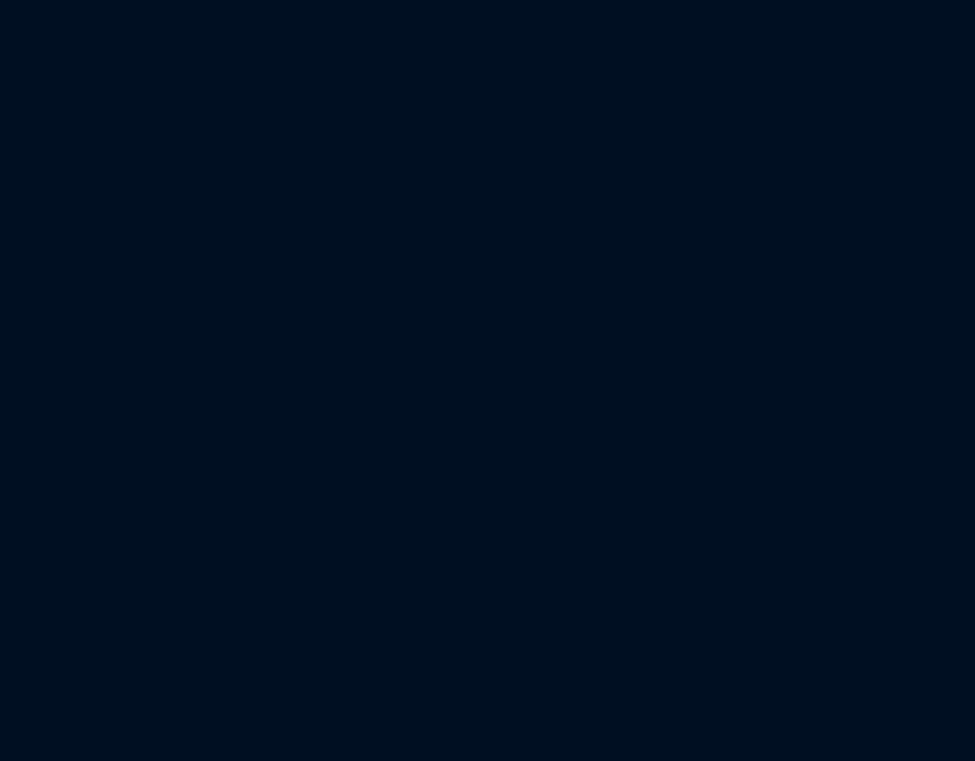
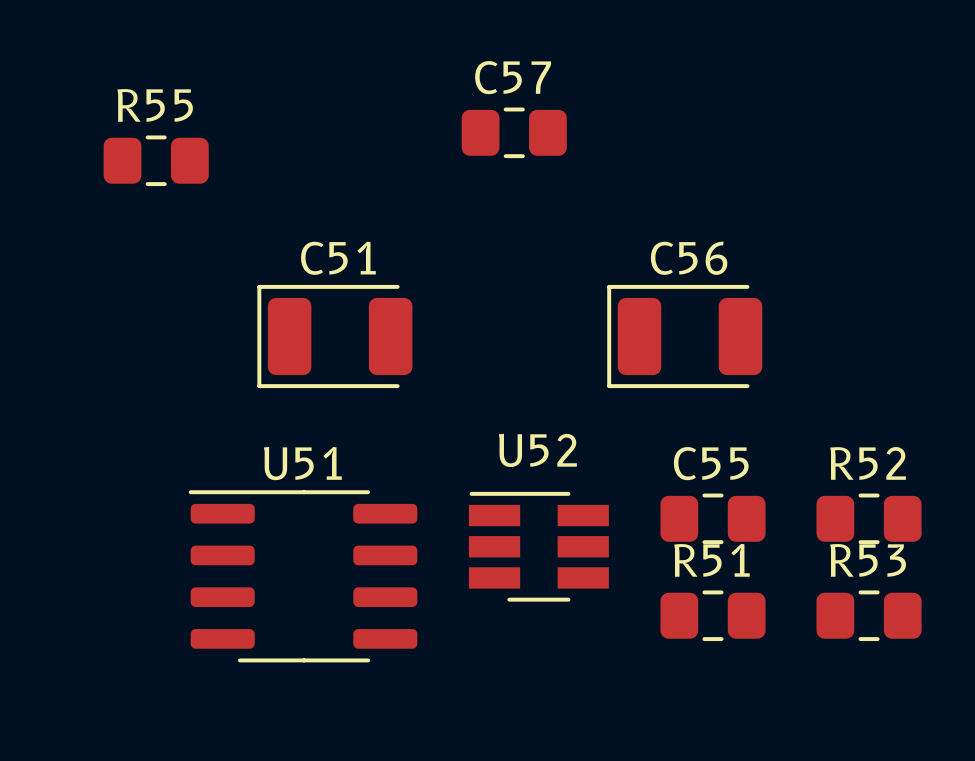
C57: none -> (514, 132)
R55: none -> (156, 160)
C51: none -> (334, 336)
C56: none -> (684, 336)
C55: none -> (713, 518)
R52: none -> (869, 518)
U52: none -> (538, 546)
U51: none -> (303, 576)
R51: none -> (713, 615)
R53: none -> (869, 615)

